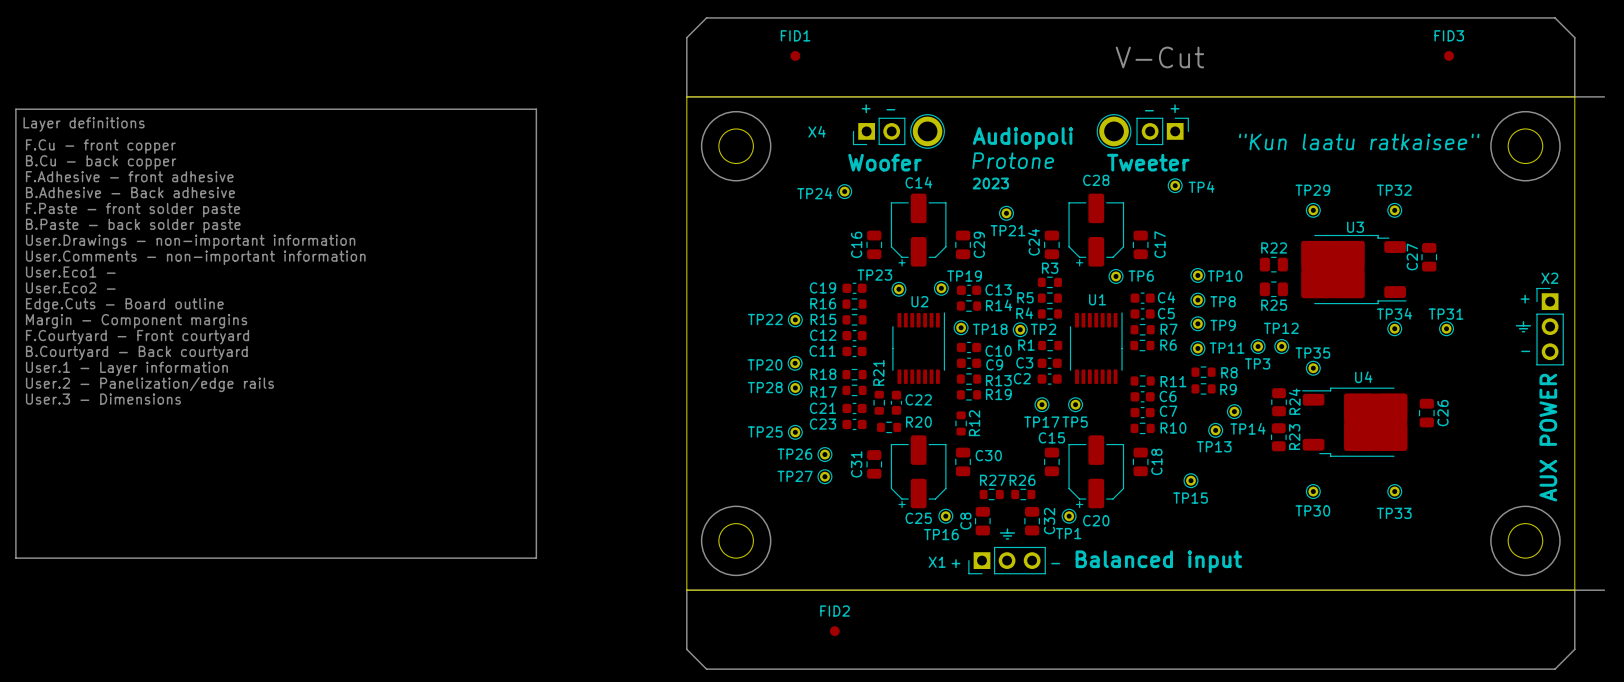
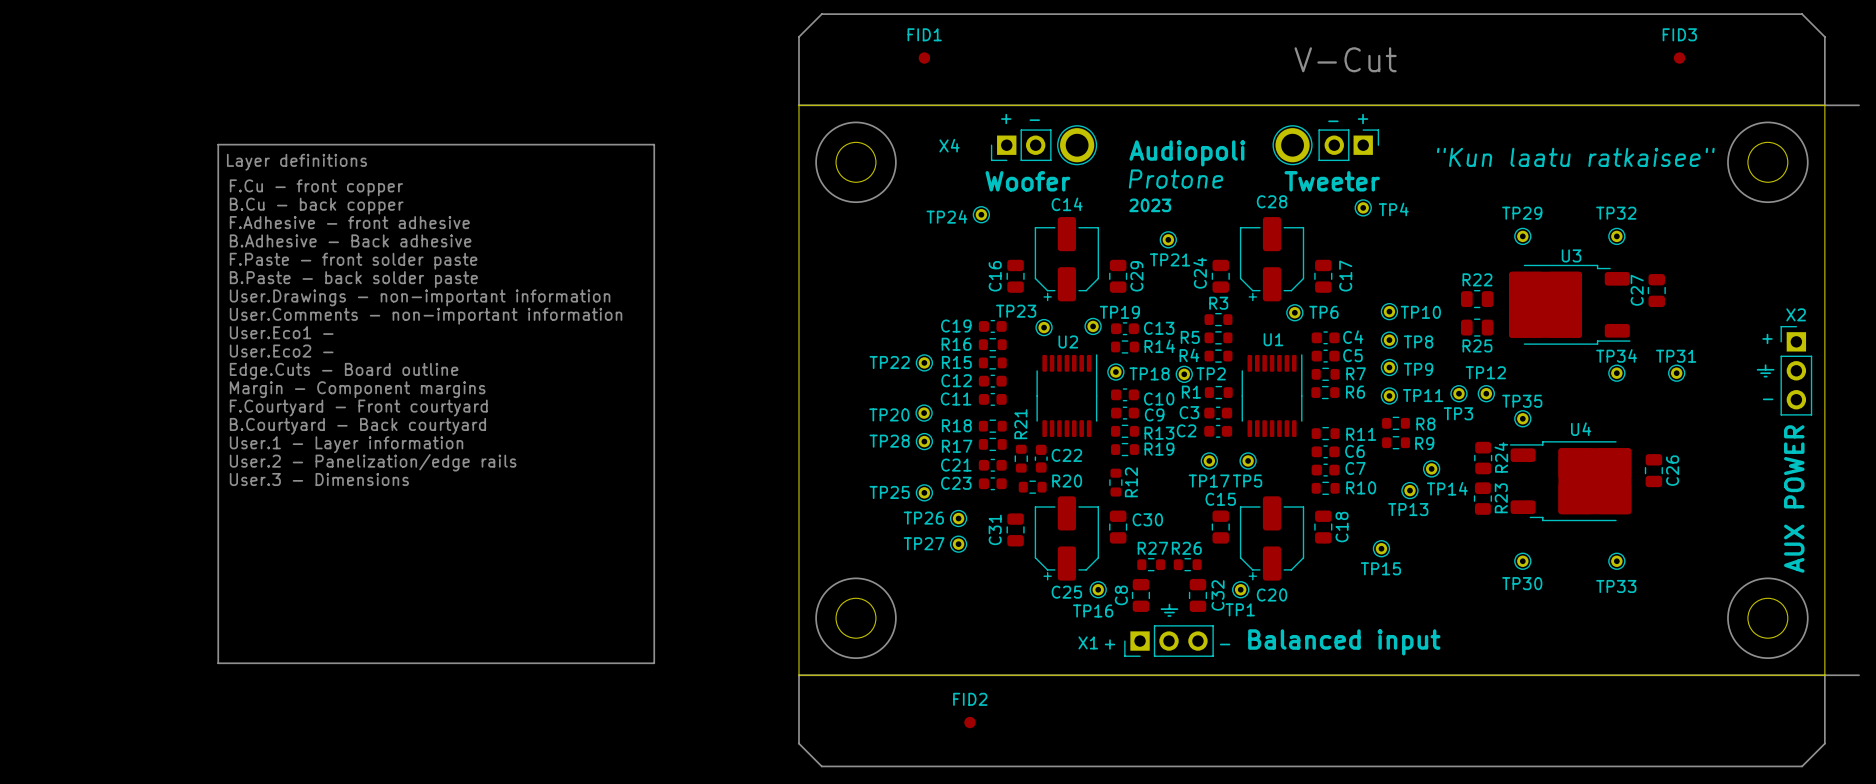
line: (15, 109) (536, 109) (536, 558) (15, 558) (15, 109) -> (218, 144) (218, 663) (654, 663) (654, 144) (218, 144)
text position: Layer definitions (84, 124) -> Layer definitions (296, 162)
text position: F.Cu - front copper (100, 146) -> F.Cu - front copper (316, 187)
text position: B.Cu - back copper (101, 162) -> B.Cu - back copper (316, 206)
text position: F.Adhesive - front adhesive (129, 176) -> F.Adhesive - front adhesive (349, 222)
text position: B.Adhesive - Back adhesive (130, 192) -> B.Adhesive - Back adhesive (350, 240)
text position: F.Paste - front solder paste (133, 210) -> F.Paste - front solder paste (353, 261)
text position: B.Paste - back solder paste (133, 225) -> B.Paste - back solder paste (353, 279)
text position: User.Drawings - non-important information (190, 241) -> User.Drawings - non-important information (420, 297)
text position: User.Comments - non-important information (195, 257) -> User.Comments - non-important information (426, 316)
text position: User.Eco1 - (70, 271) -> User.Eco1 - (281, 332)
text position: User.Eco2 - (70, 287) -> User.Eco2 - (281, 351)
text position: Edge.Cuts - Board outline (124, 305) -> Edge.Cuts - Board outline (344, 371)
text position: Margin - Component margins (136, 321) -> Margin - Component margins (357, 389)
text position: F.Courtyard - Front courtyard (137, 337) -> F.Courtyard - Front courtyard (358, 407)
text position: B.Courtyard - Back courtyard (136, 353) -> B.Courtyard - Back courtyard (357, 426)
text position: User.1 - Layer information (126, 368) -> User.1 - Layer information (346, 444)
text position: User.2 - Panelization/edge rails (149, 384) -> User.2 - Panelization/edge rails (373, 462)
text position: User.3 - Dimensions (103, 399) -> User.3 - Dimensions (319, 479)

